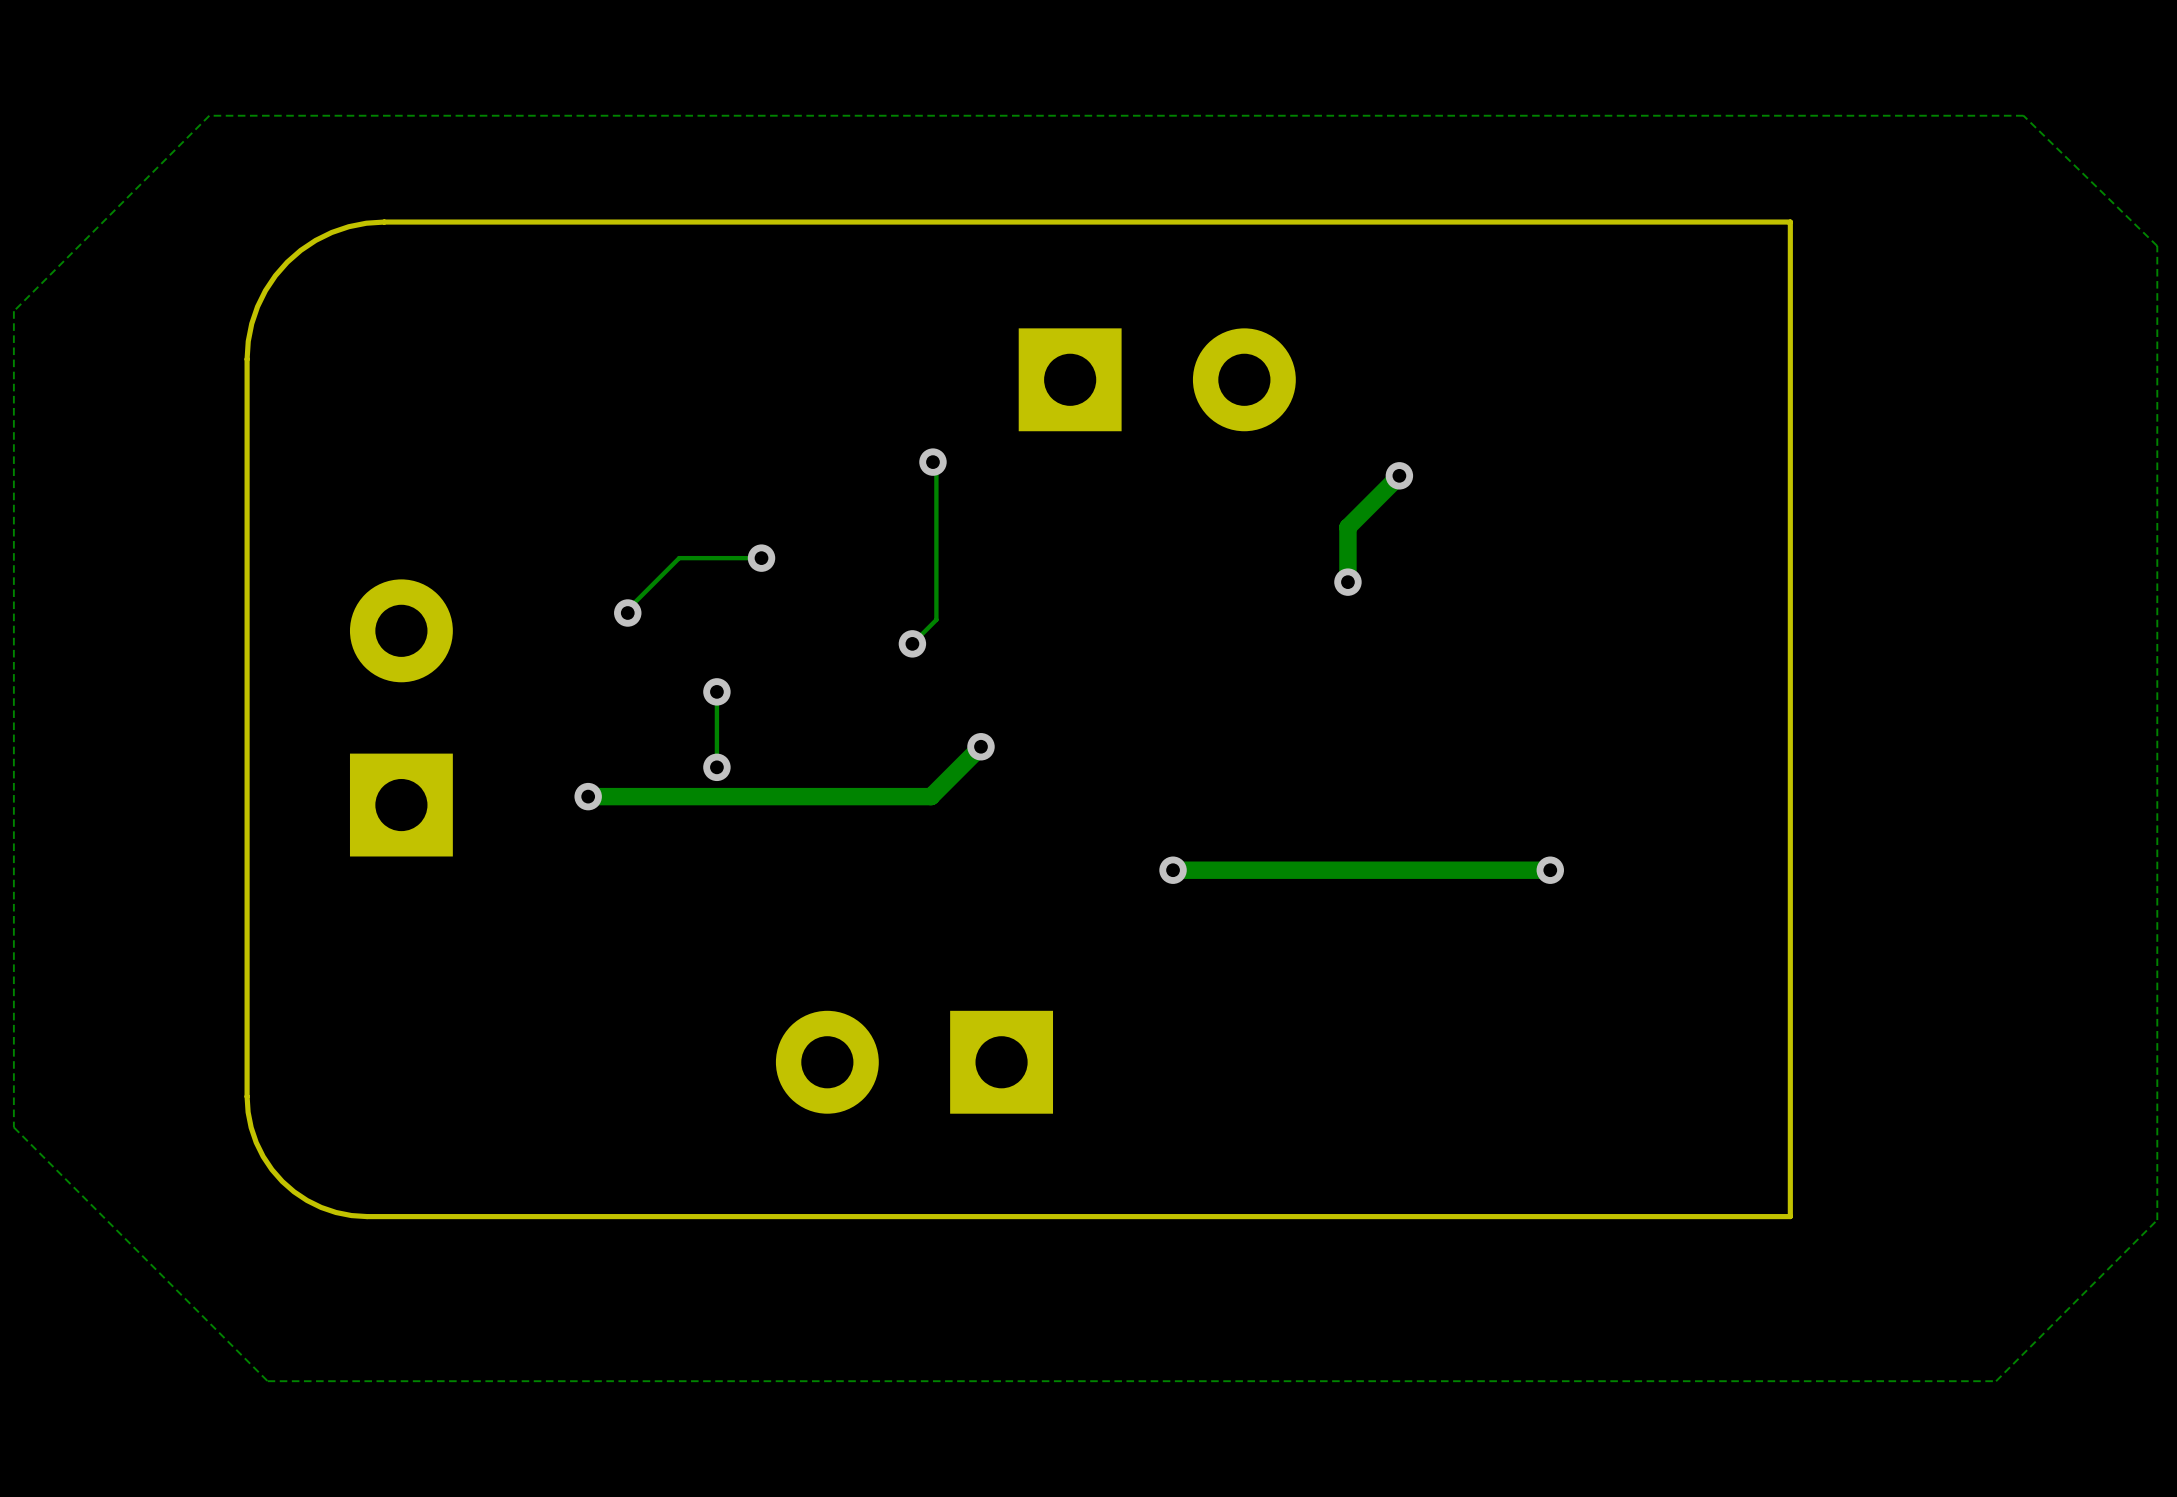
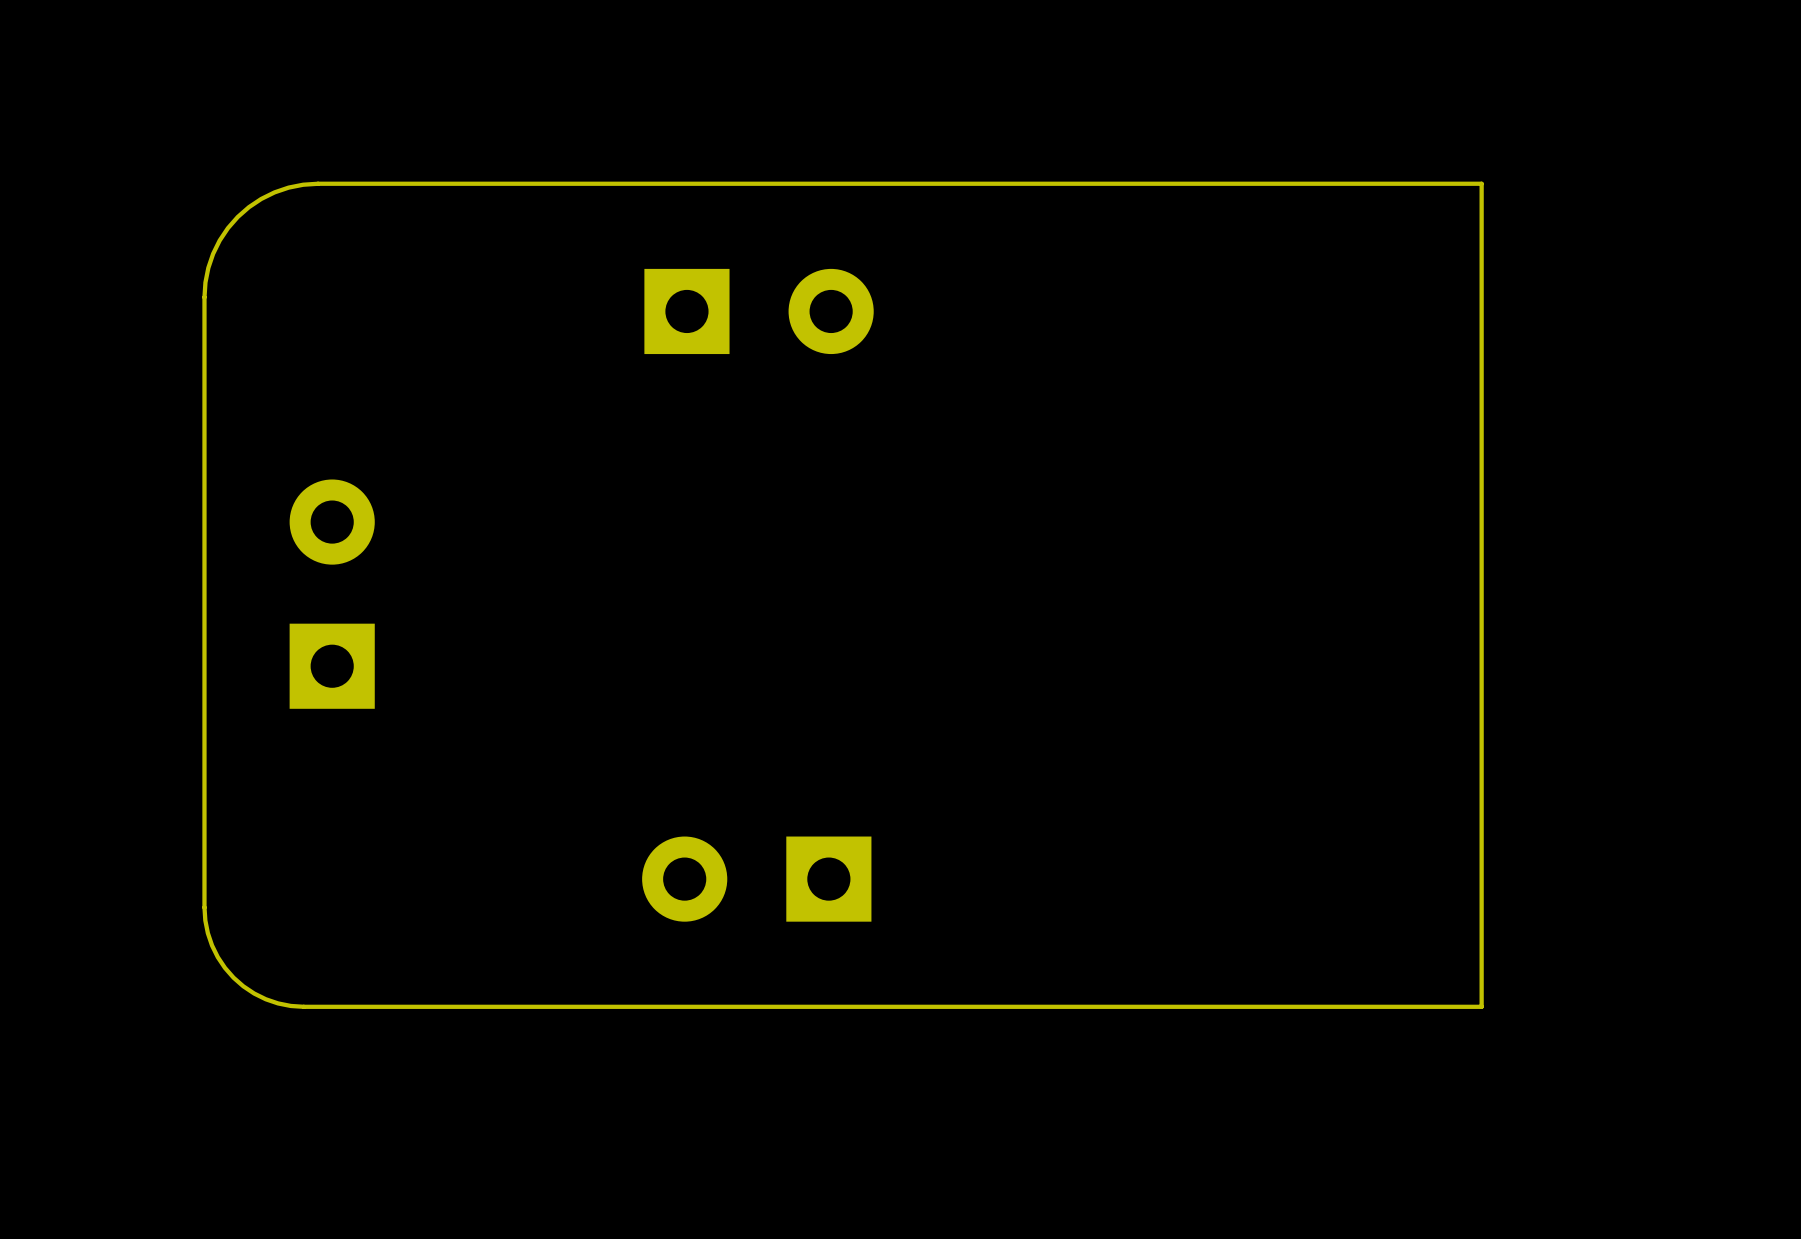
zone outline: (2023, 115) (209, 115) (13, 311) (13, 1127) (267, 1381) (1996, 1381) (2157, 1220) (2157, 246) (2023, 115) -> none
part position: (1157, 379) -> (759, 311)
track: (932, 462) (936, 465) (936, 619) (912, 643) -> none
via: (932, 462) -> none
track: (1399, 475) (1347, 527) (1347, 582) -> none
via: (1399, 475) -> none
track: (761, 558) (679, 558) (627, 609) (627, 613) -> none
via: (761, 558) -> none
via: (1347, 582) -> none
via: (627, 613) -> none
via: (912, 643) -> none
track: (716, 691) (716, 767) -> none
via: (716, 691) -> none
track: (980, 746) (931, 796) (588, 796) -> none
via: (980, 746) -> none
via: (716, 767) -> none
via: (588, 796) -> none
via: (1173, 870) -> none
track: (1550, 870) (1173, 870) -> none
via: (1550, 870) -> none

